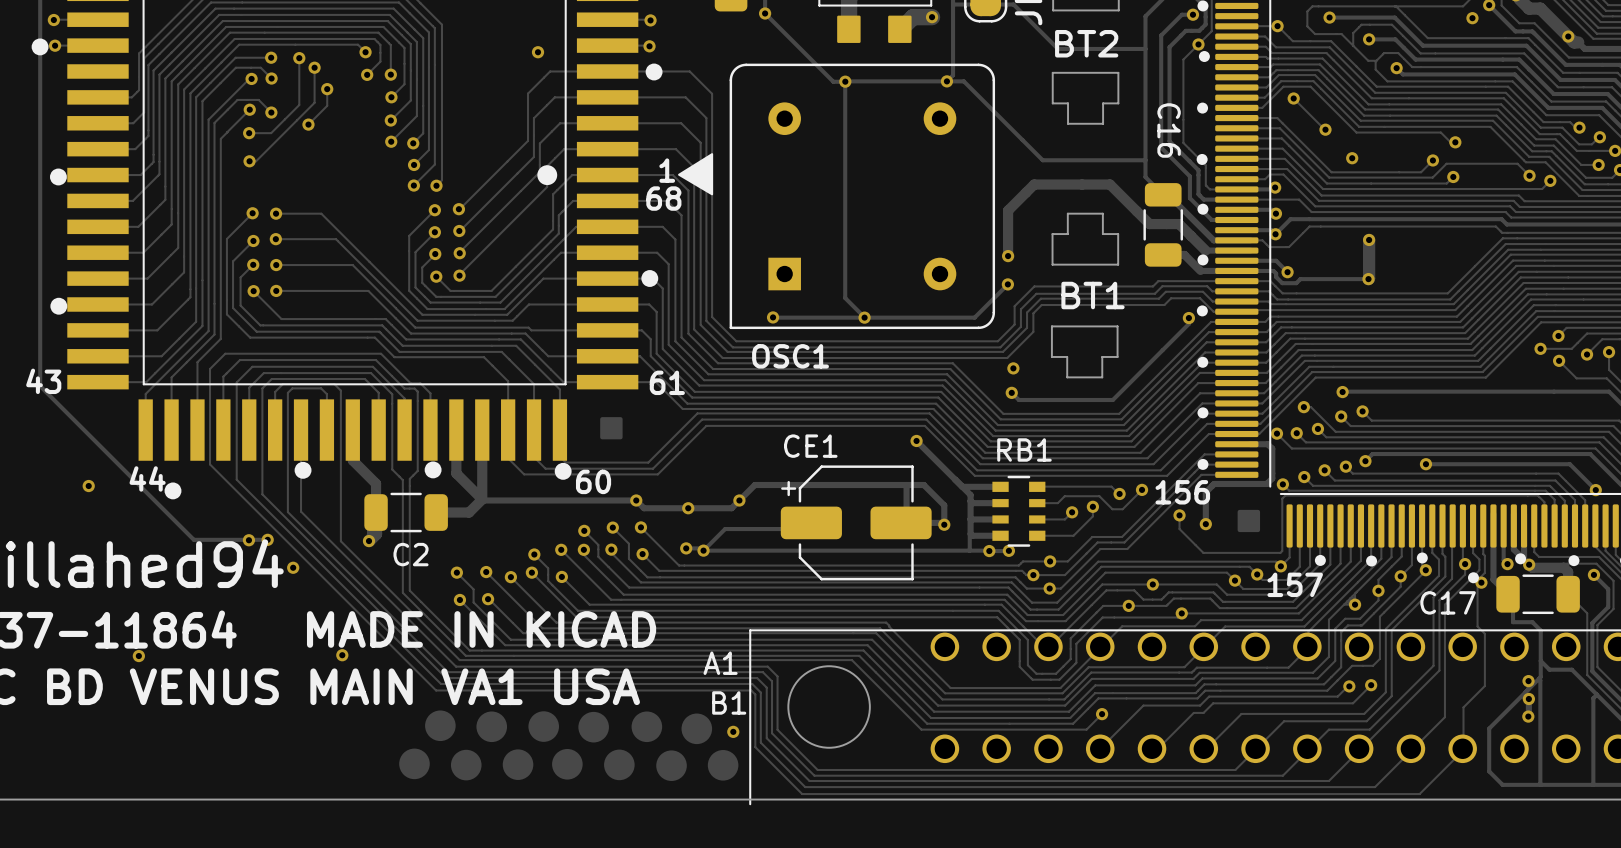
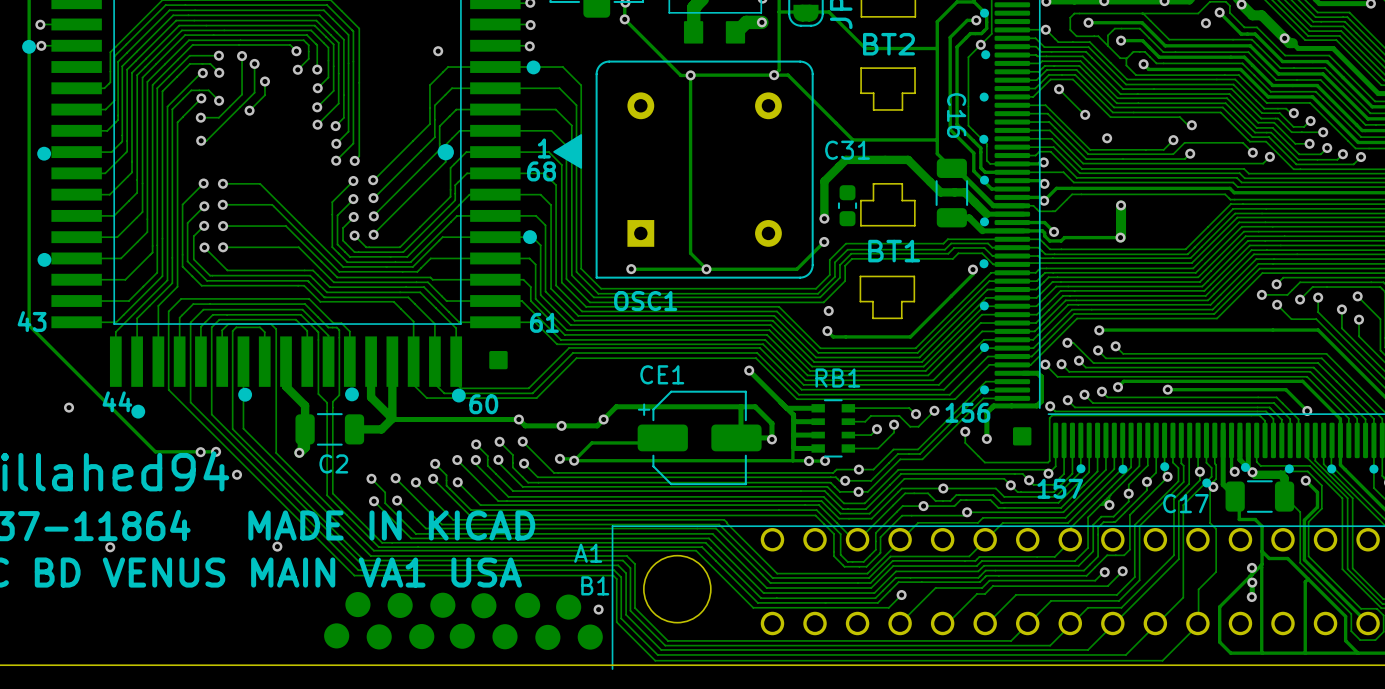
C31: none -> (847, 205)

